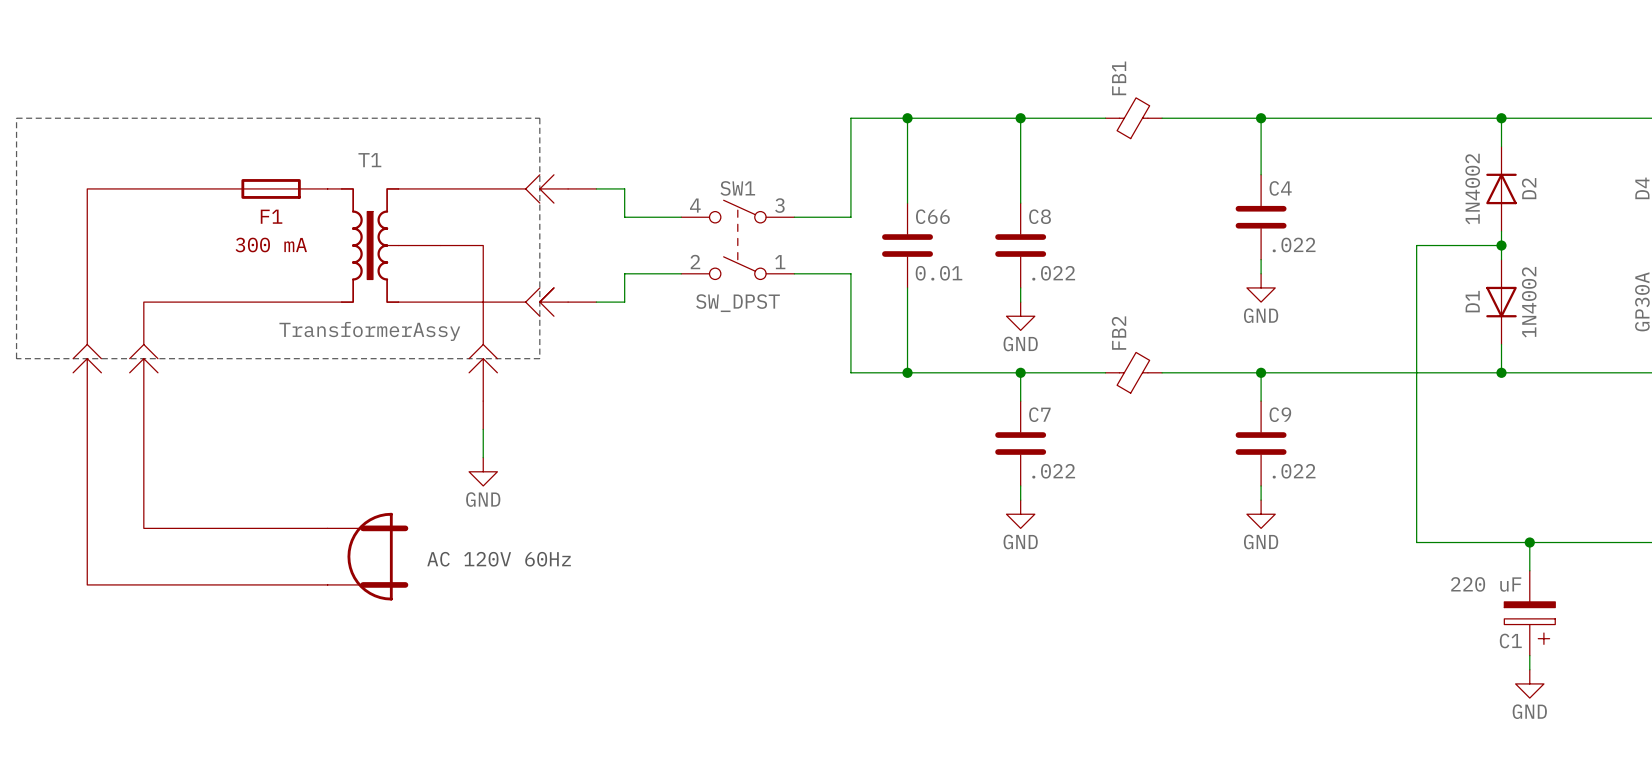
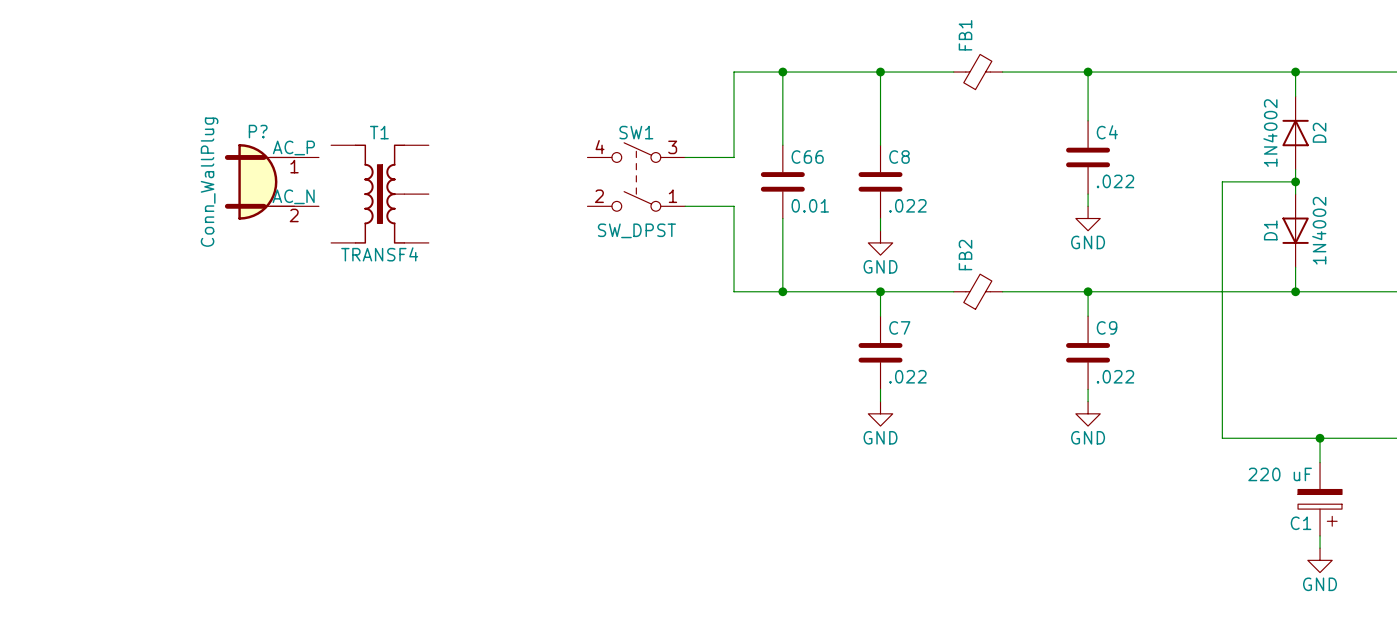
line: (16, 118) (539, 118) (539, 358) (16, 358) (16, 118) -> none
T1 name position: T1 (369, 160) -> T1 (379, 132)
T1 symbol: [73, 174, 597, 601] -> [331, 144, 429, 244]
wire: (596, 188) (624, 188) (624, 217) (681, 217) -> none
P?: none -> Conn_WallPlug (271, 181)
wire: (681, 273) (624, 273) (624, 302) (596, 302) -> none
T1 value: TransformerAssy (369, 331) -> TRANSF4 (379, 254)
wire: (483, 429) (483, 457) -> none
power symbol: GND (483, 471) -> none
text: AC 120V 60Hz (499, 559) -> none

